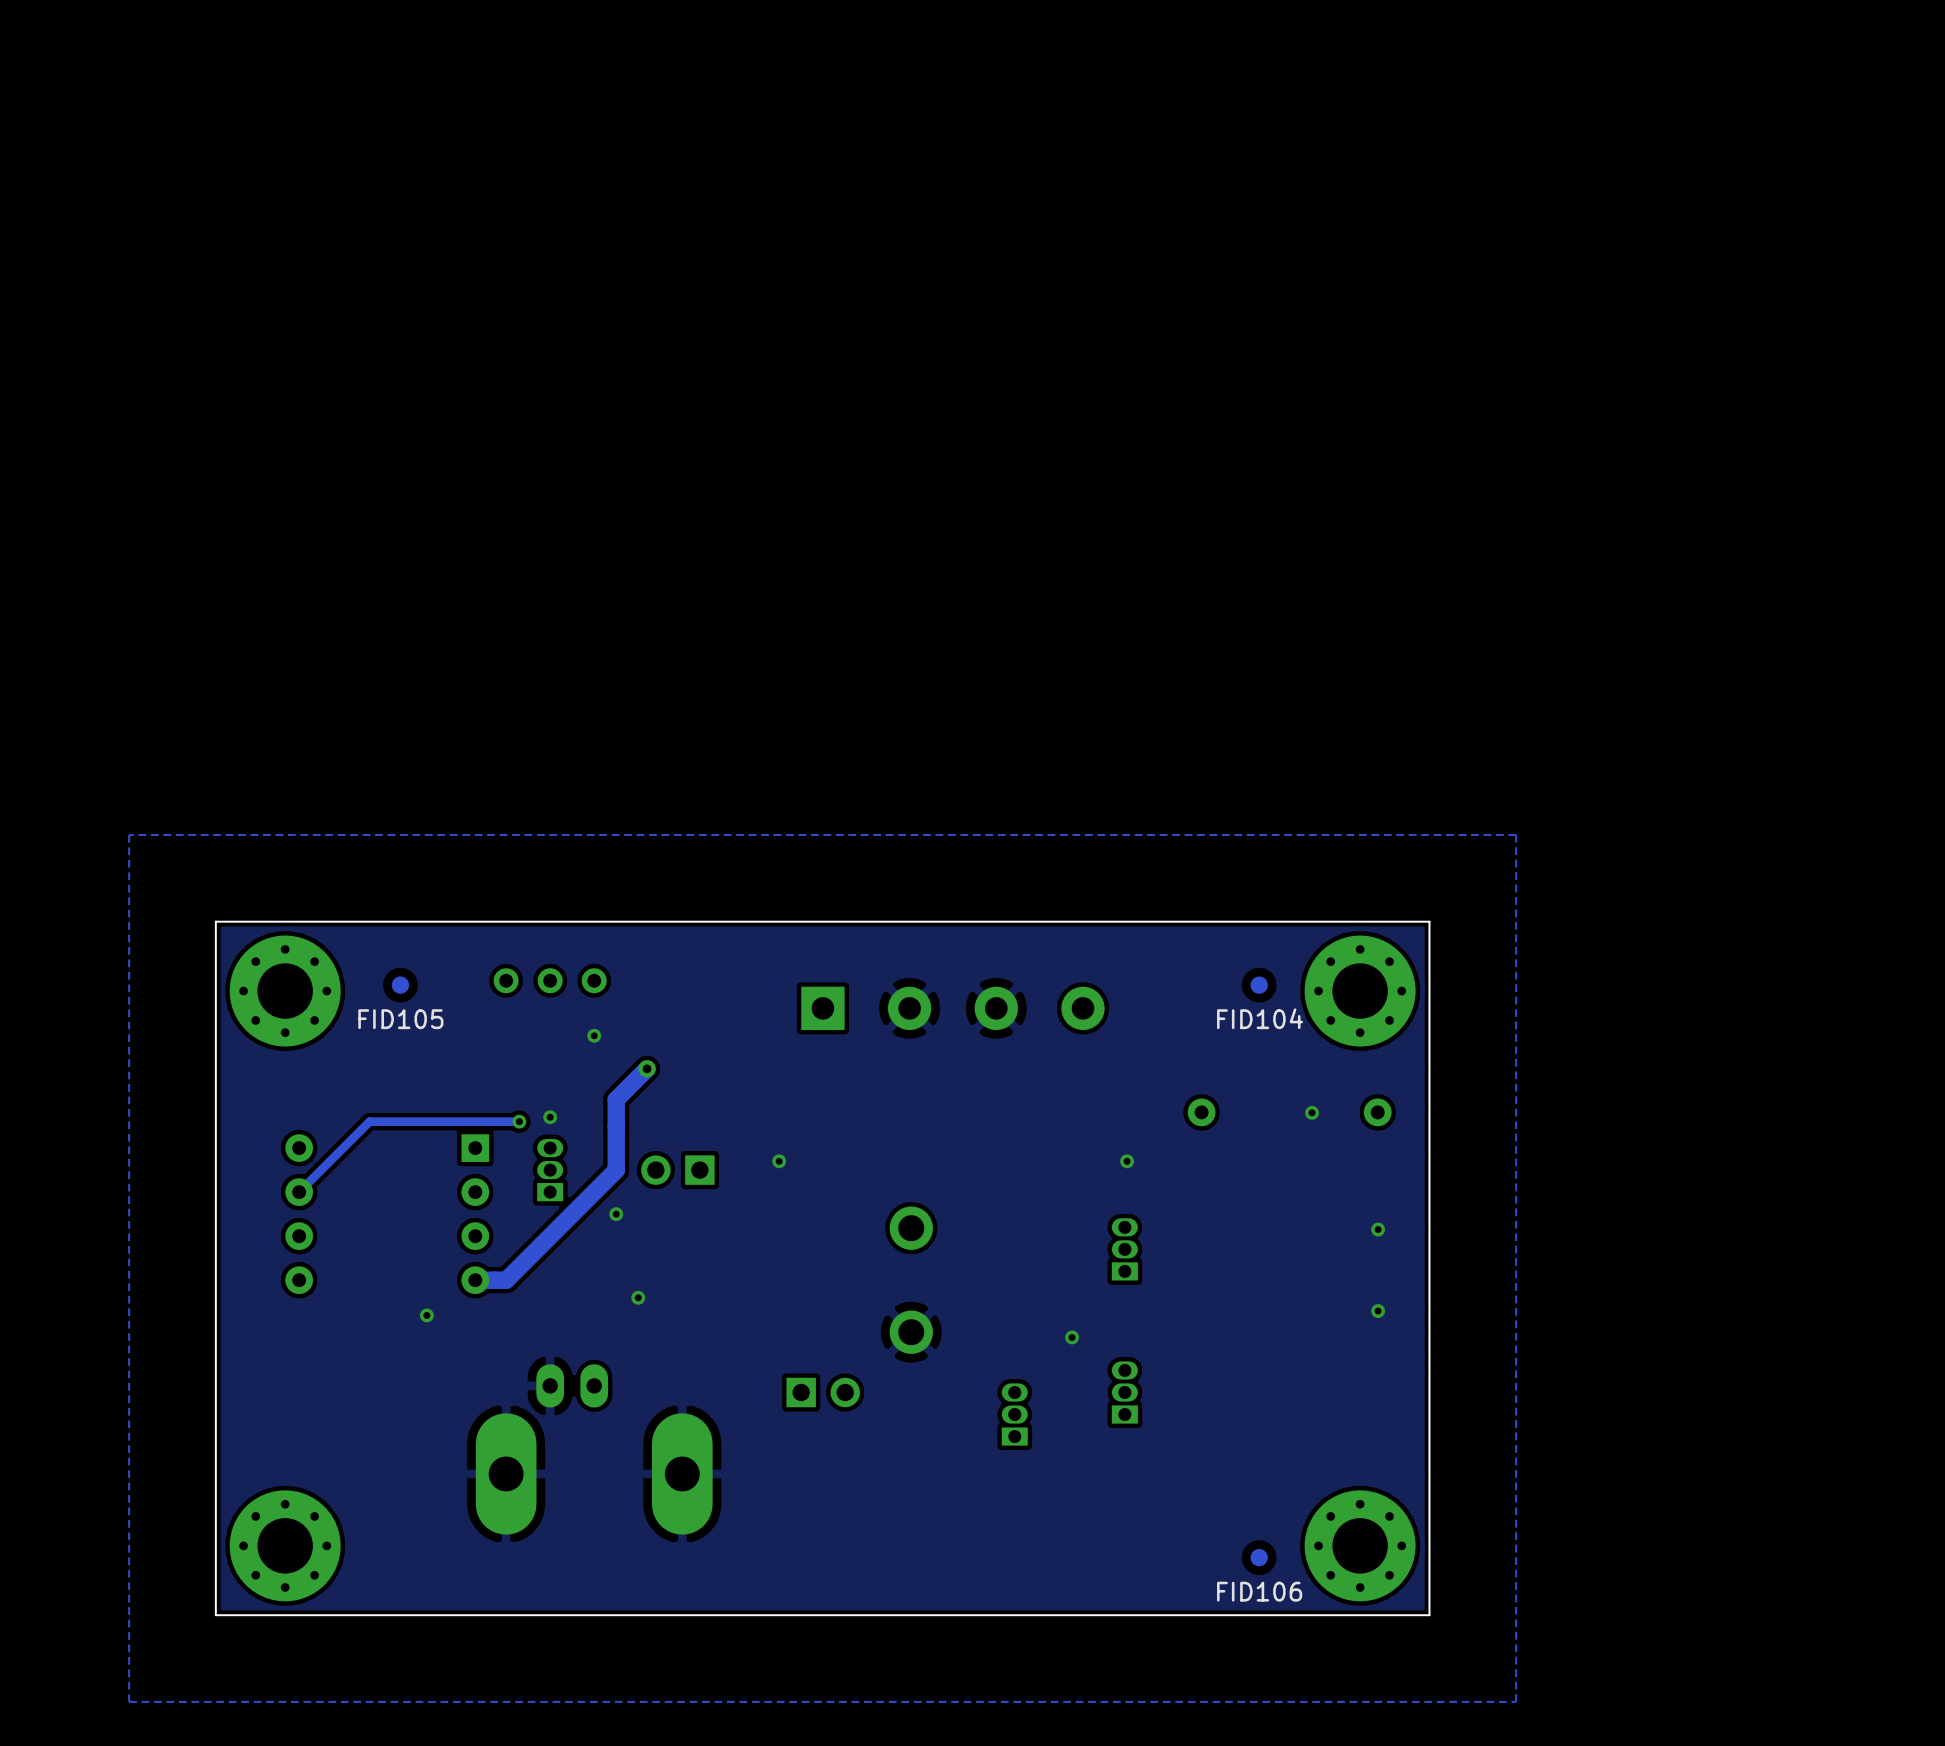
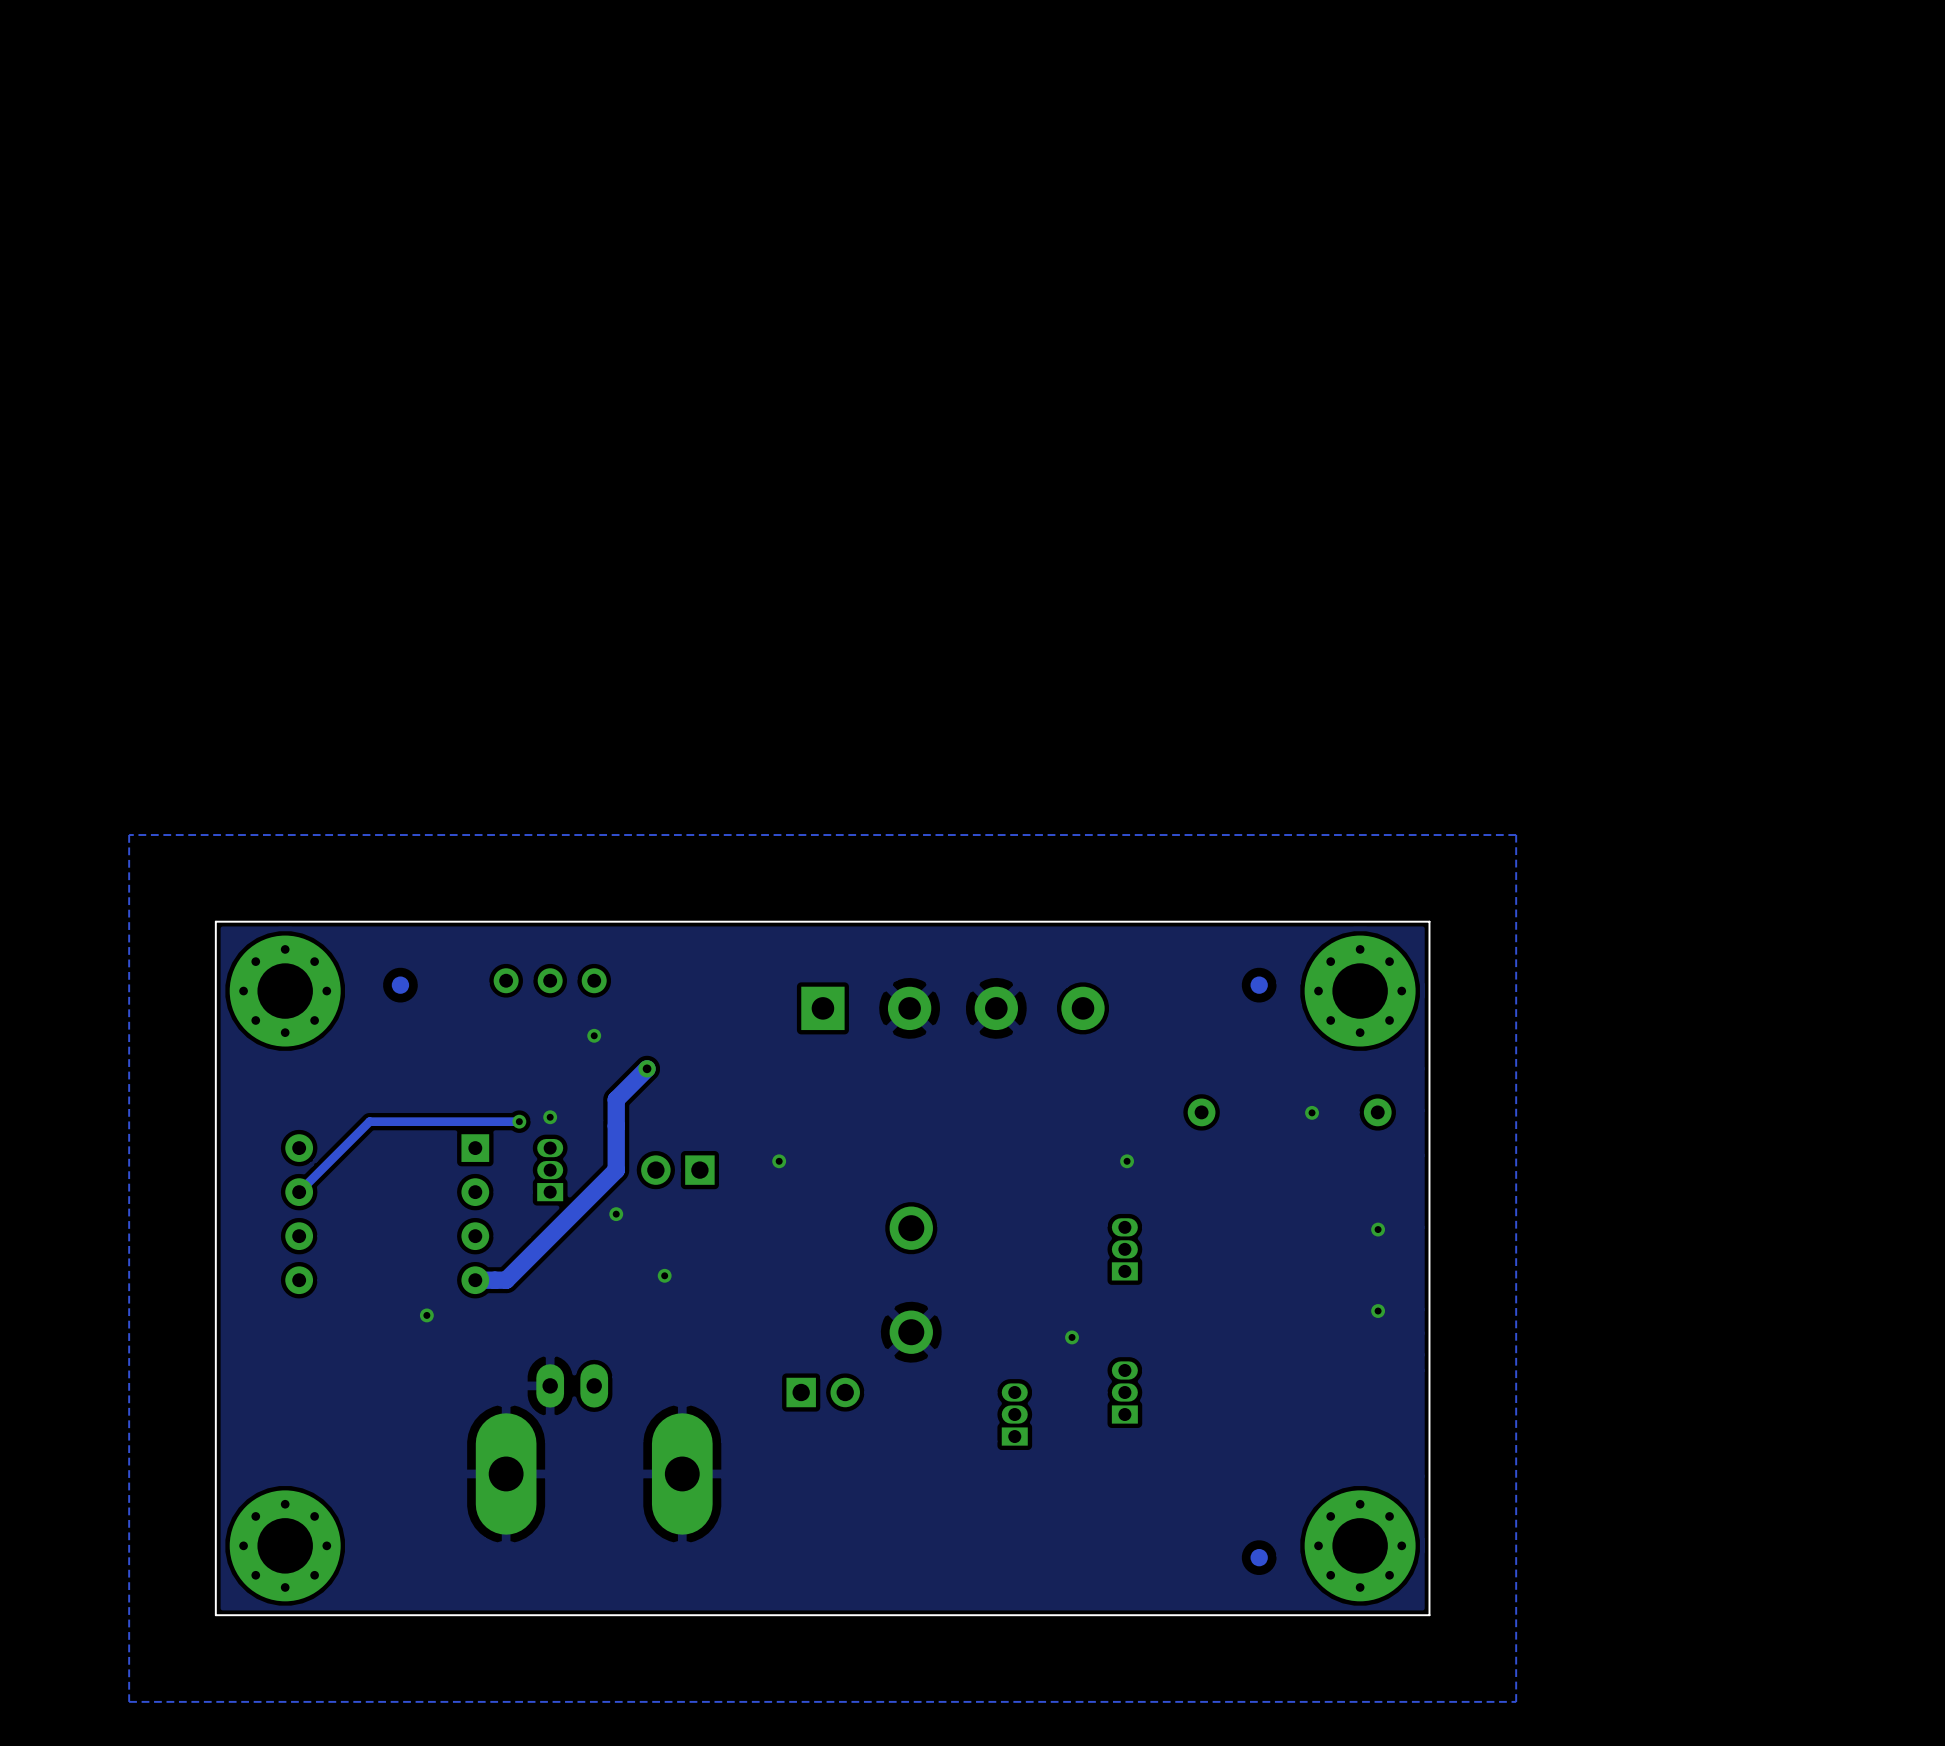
FID104 name: FID104 (1260, 1018) -> none
FID105 name: FID105 (400, 1019) -> none
via position: (638, 1297) -> (664, 1275)
FID106 name: FID106 (1259, 1591) -> none

